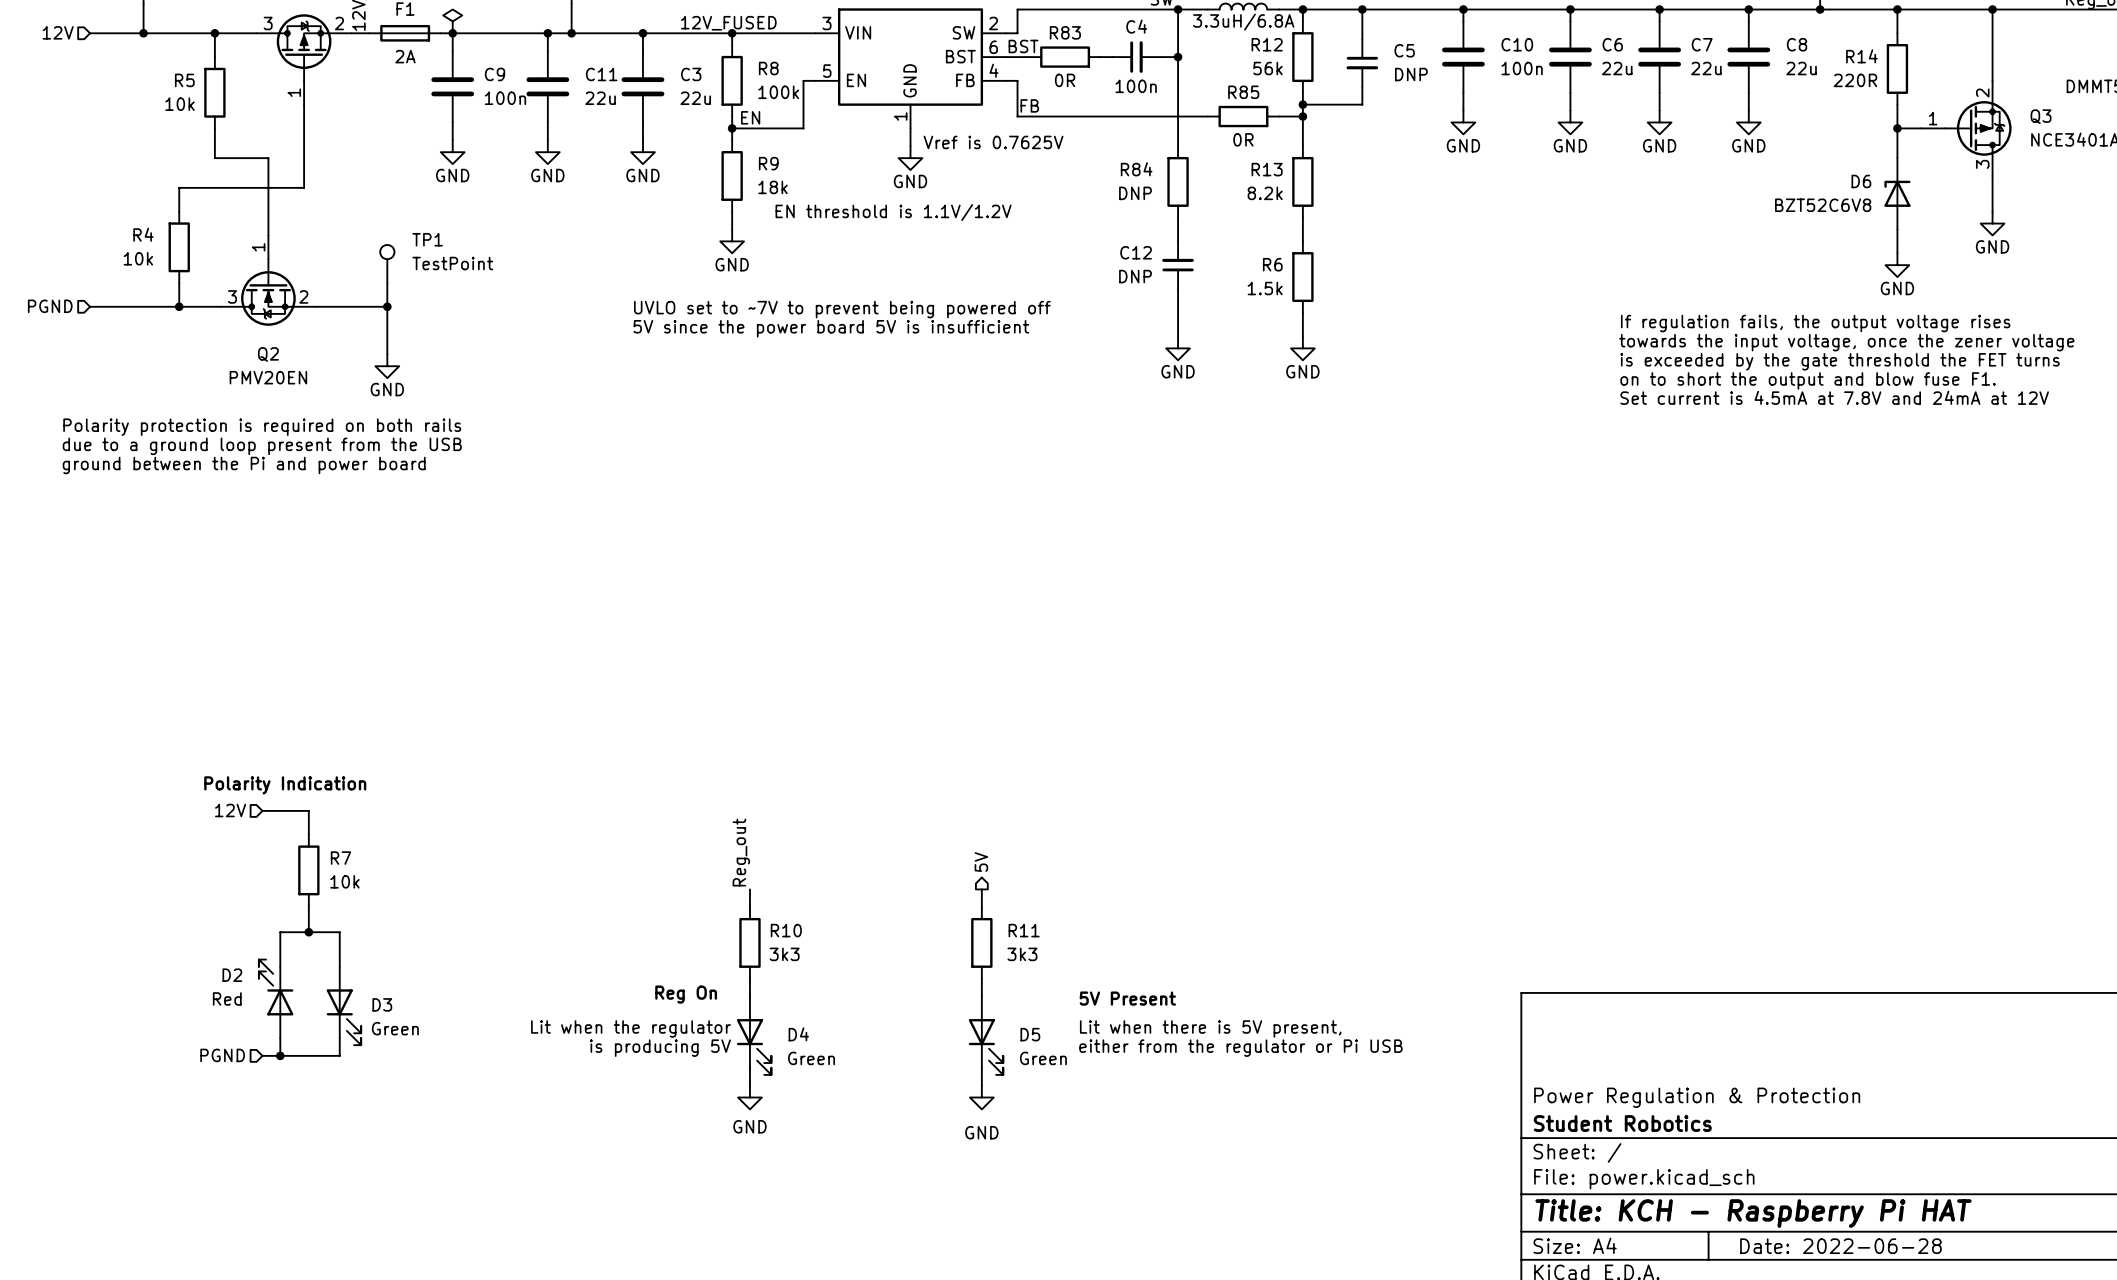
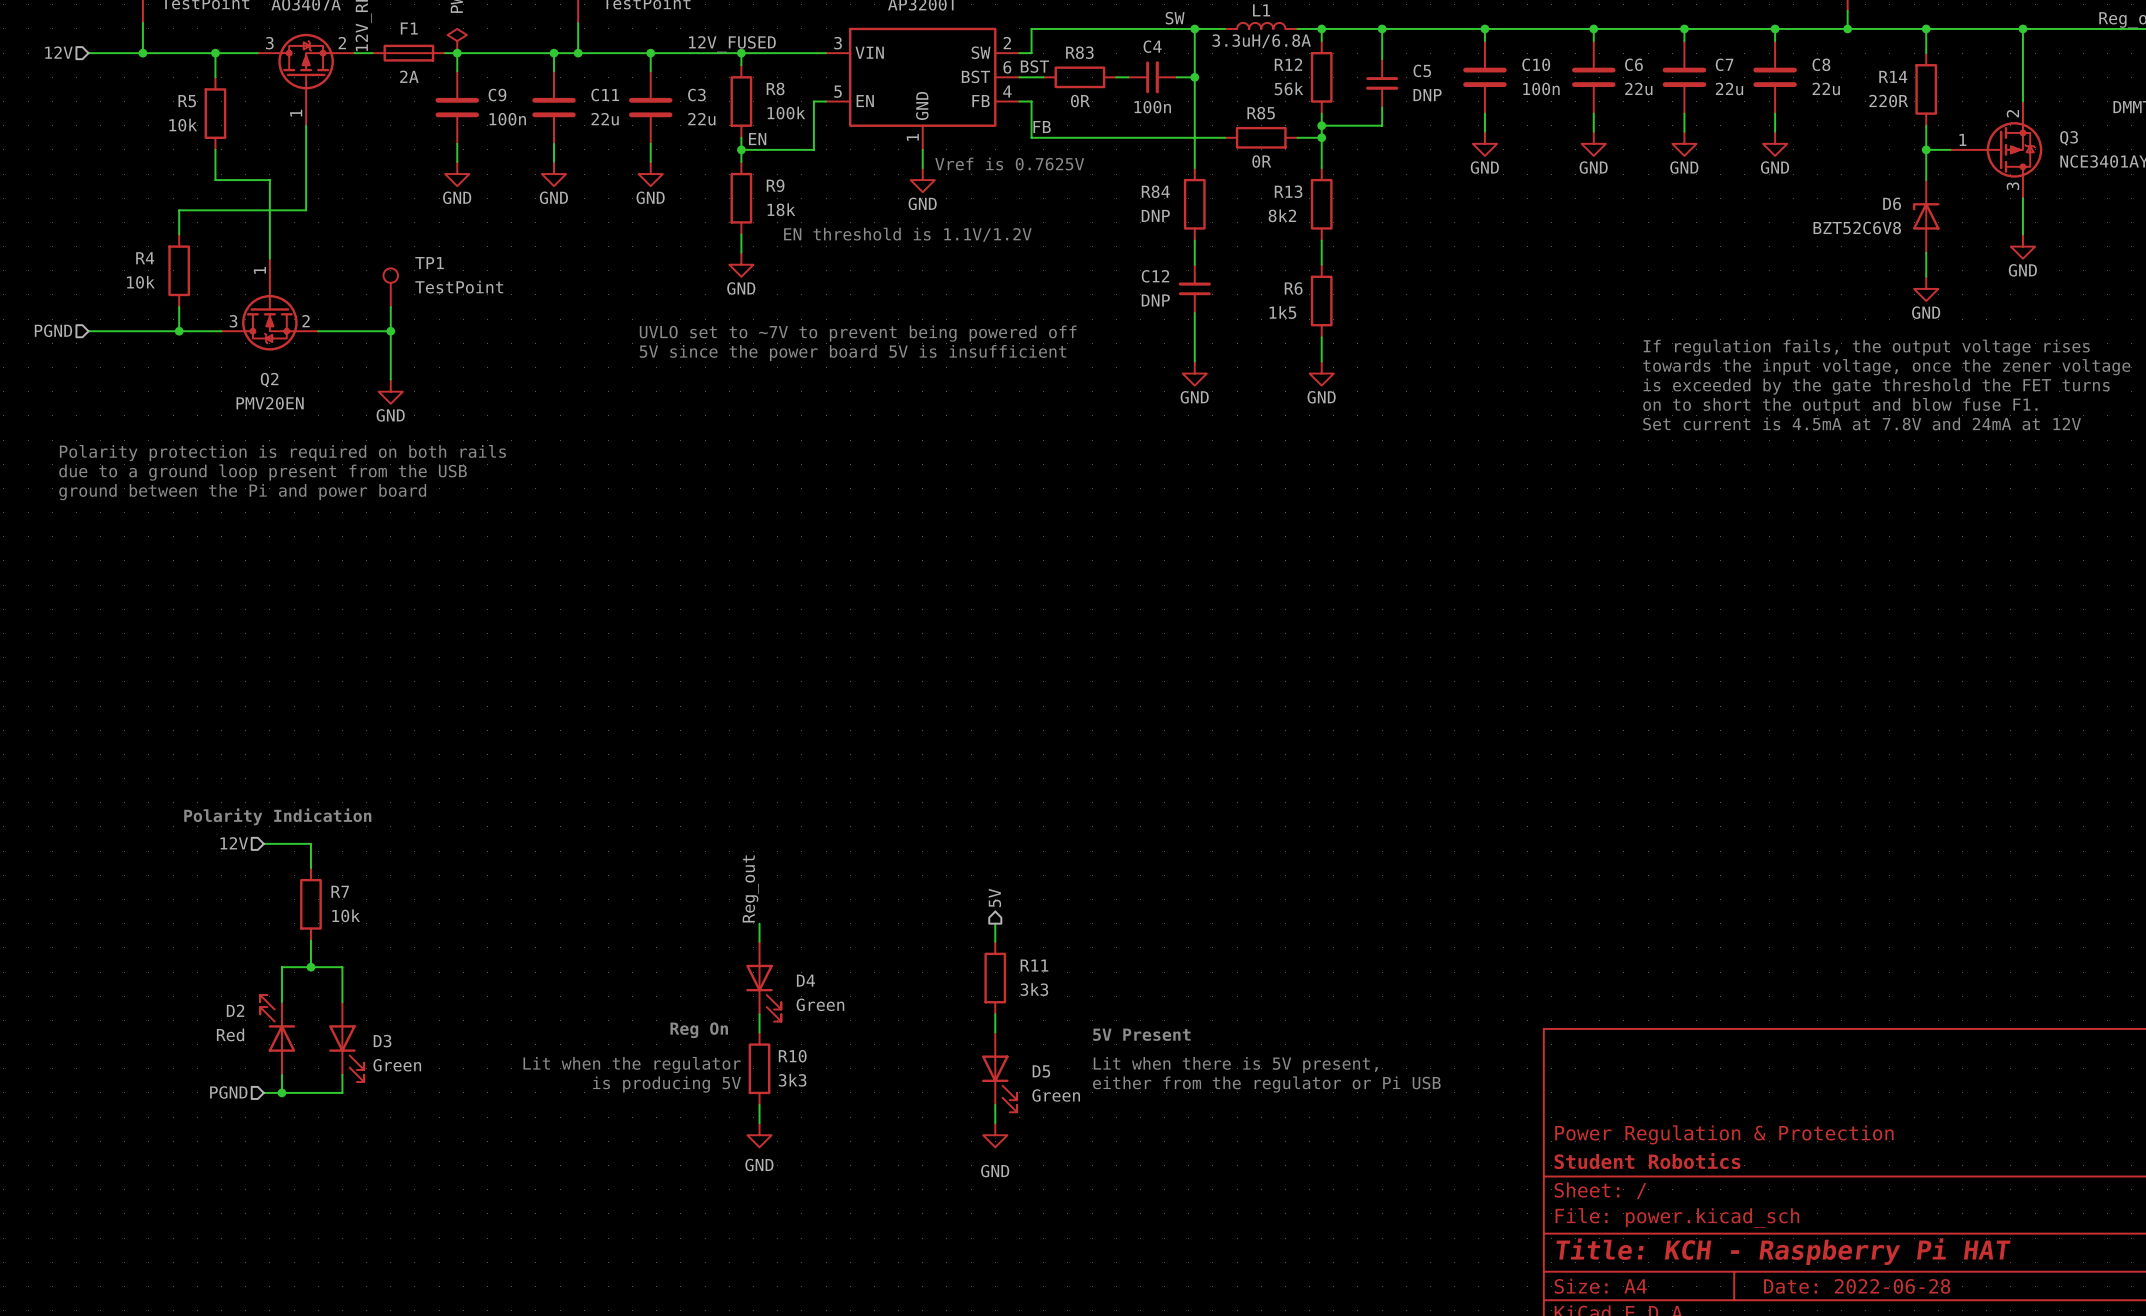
R13 value: 8.2k (1265, 193) -> 8k2 (1282, 215)
R6 value: 1.5k (1265, 288) -> 1k5 (1282, 312)
R10 position: (749, 942) -> (759, 1068)
D4 position: (754, 1035) -> (763, 981)

